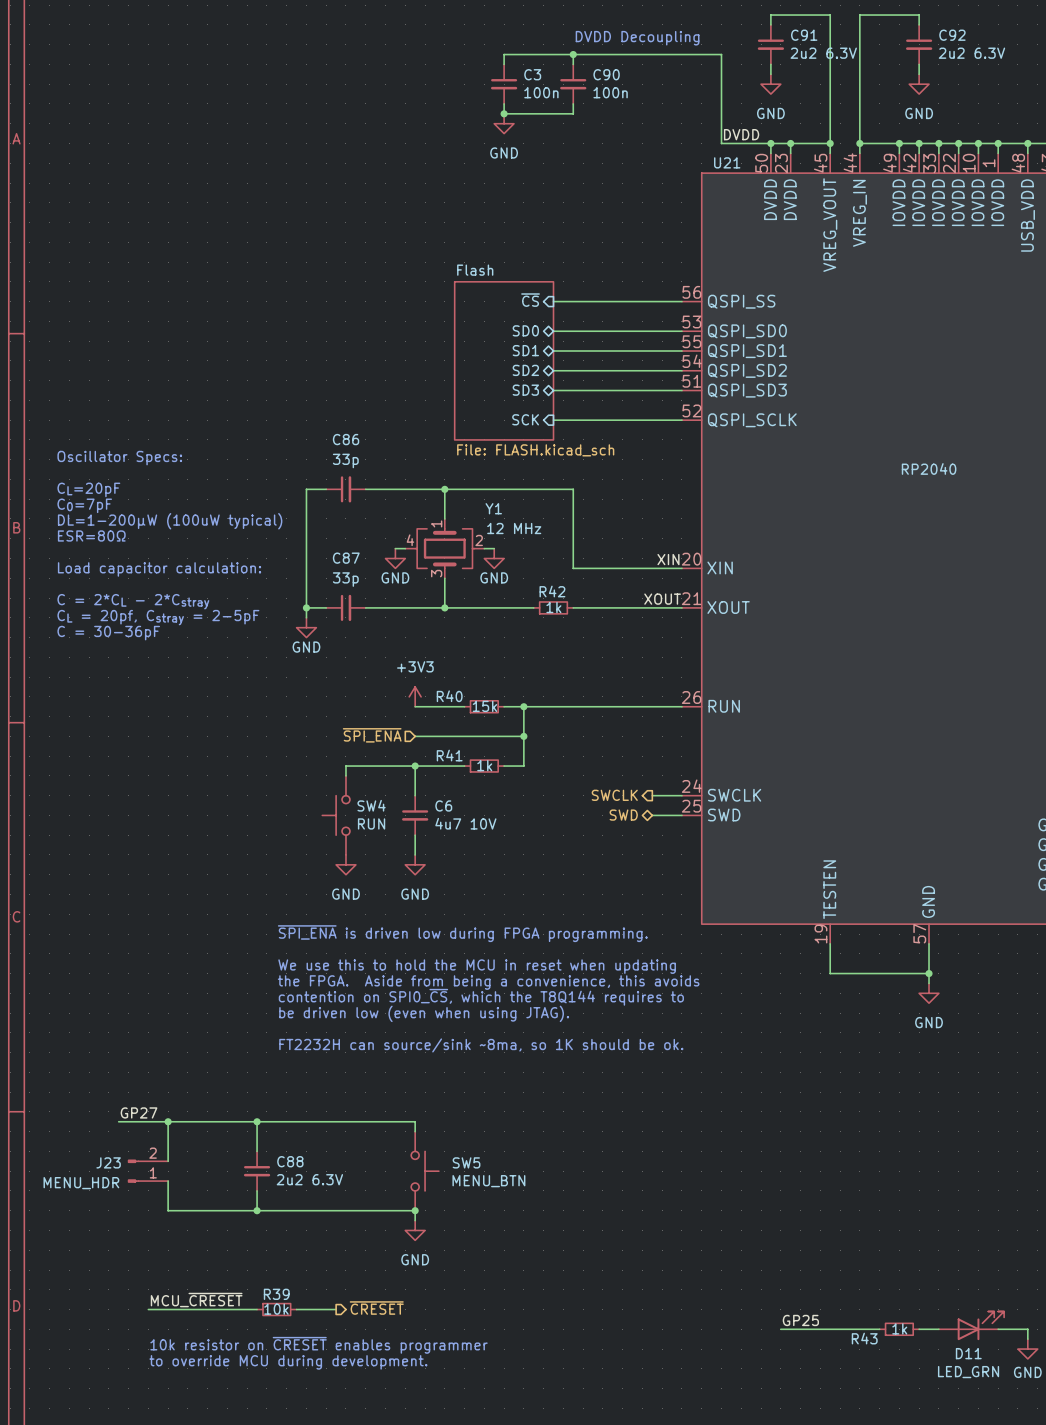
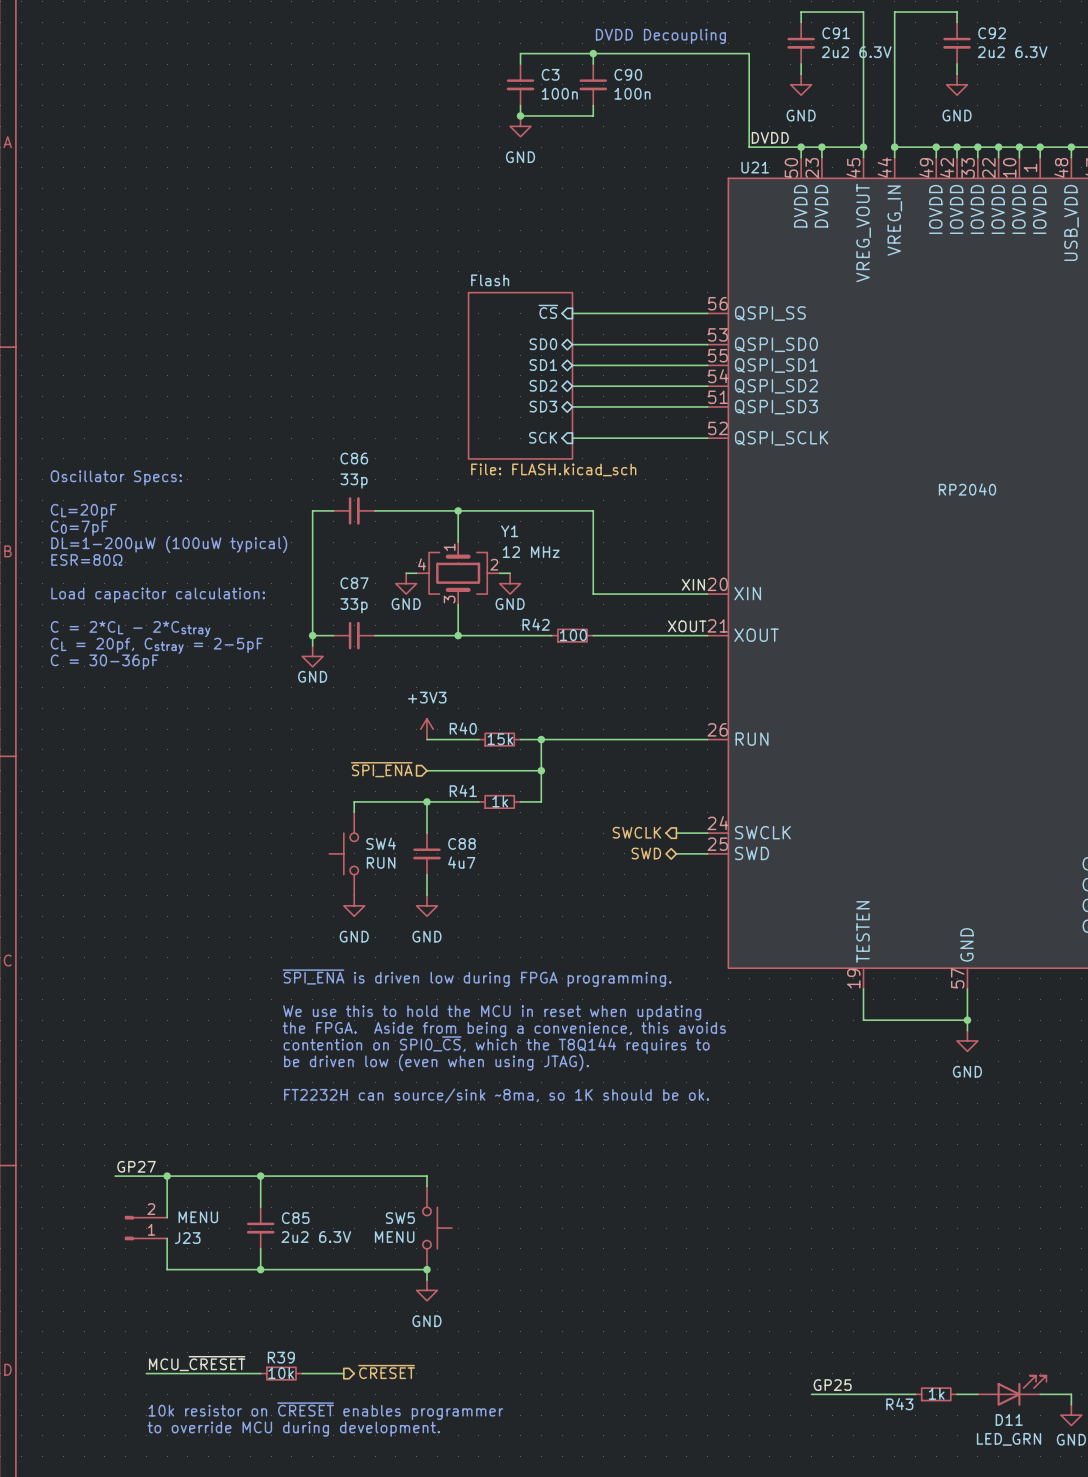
R42 name position: R42 (552, 591) -> R42 (536, 624)
R42 value: 1k (553, 607) -> 100 (573, 635)
C6 name: C6 (443, 805) -> C88 (462, 843)
C6 value: 4u7 10V (465, 823) -> 4u7 (461, 862)
C88 name: C88 (290, 1161) -> C85 (295, 1218)
J23 name position: J23 (108, 1162) -> J23 (187, 1238)
SW5 name position: SW5 (466, 1162) -> SW5 (400, 1218)
SW5 value: MENU_BTN (488, 1181) -> MENU (394, 1237)
J23 value: MENU_HDR (81, 1183) -> MENU (198, 1217)

